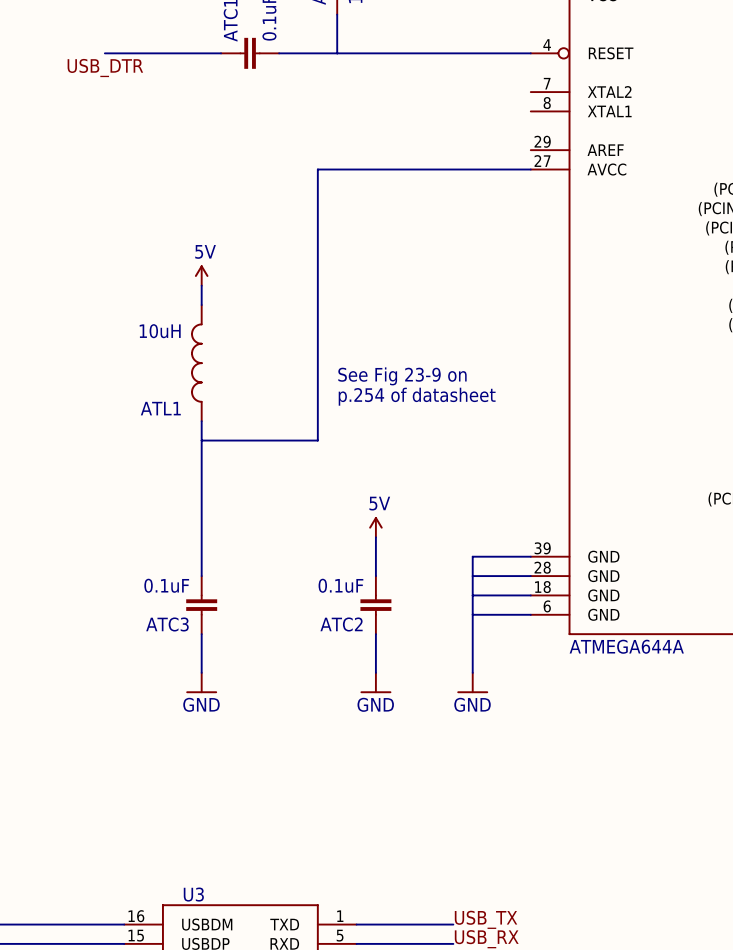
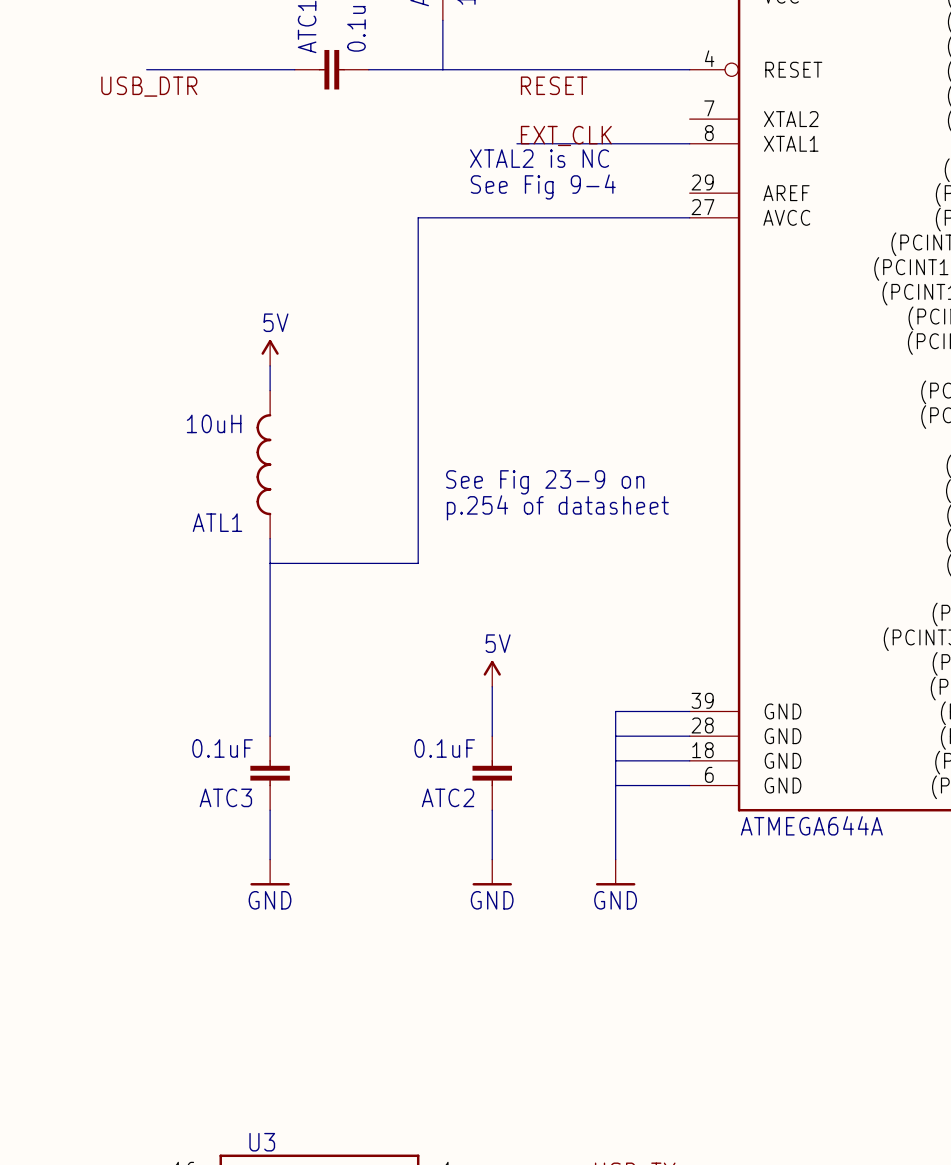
label: none -> RESET (554, 85)
label: none -> EXT_CLK (566, 135)
wire: none -> (516, 143) (689, 143)
text: none -> XTAL2 is NC (539, 158)
text: none -> See Fig 9-4 (543, 186)

